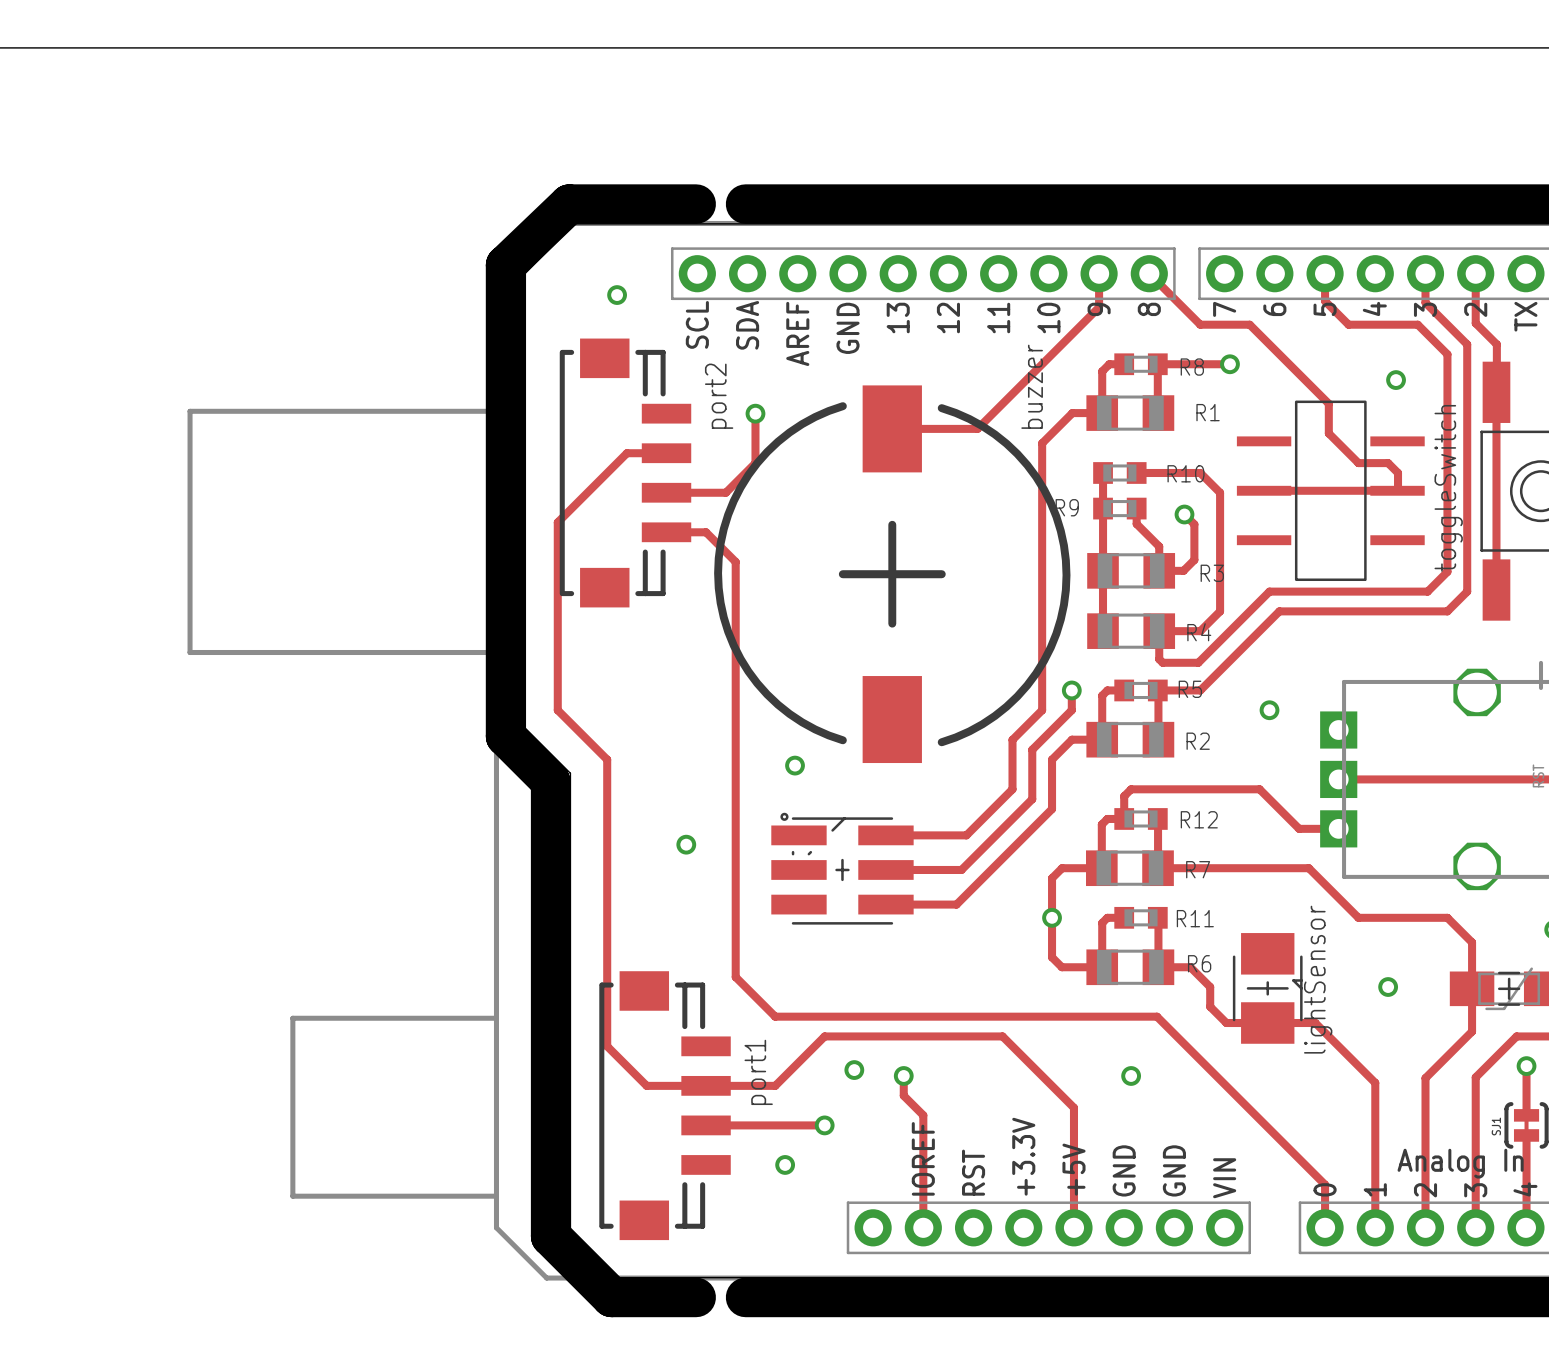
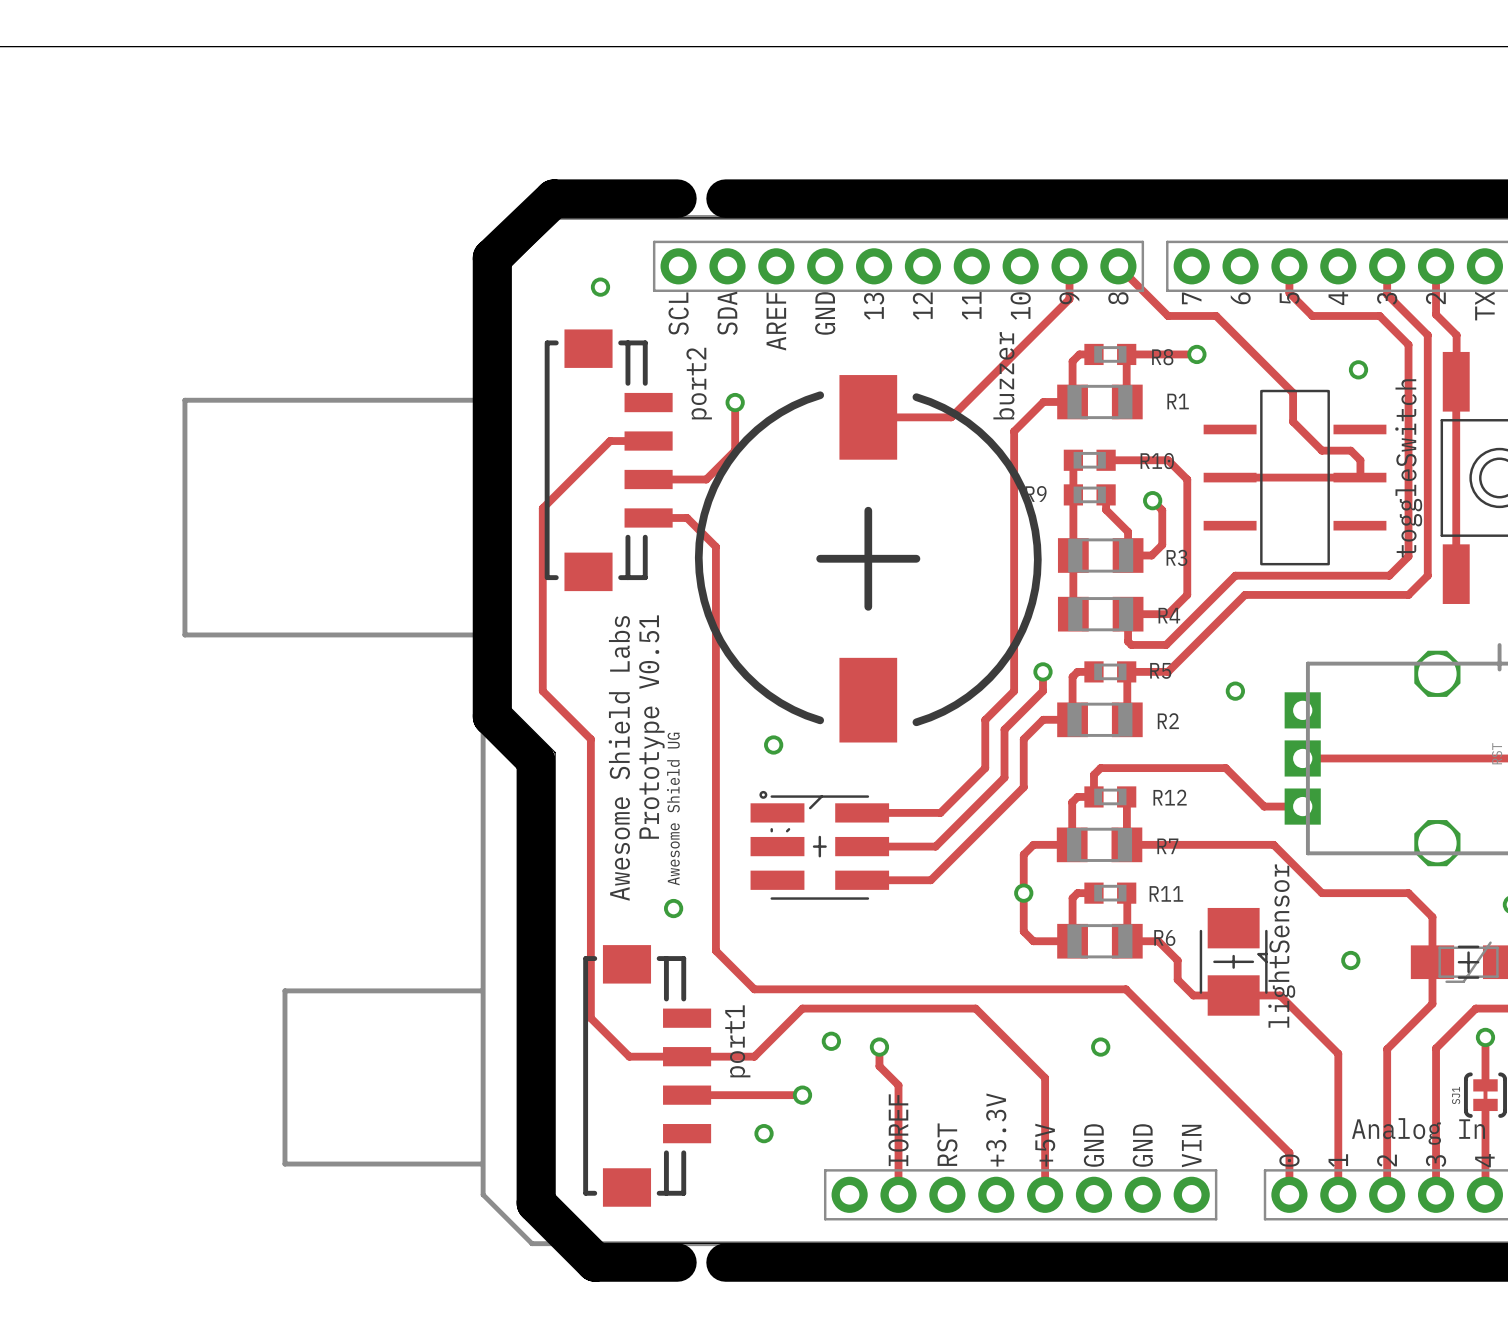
text: none -> Prototype V0.51 (651, 727)
text: none -> Awesome Shield Labs (619, 758)
text: none -> Awesome Shield UG (673, 809)
via position: (686, 844) -> (673, 908)

